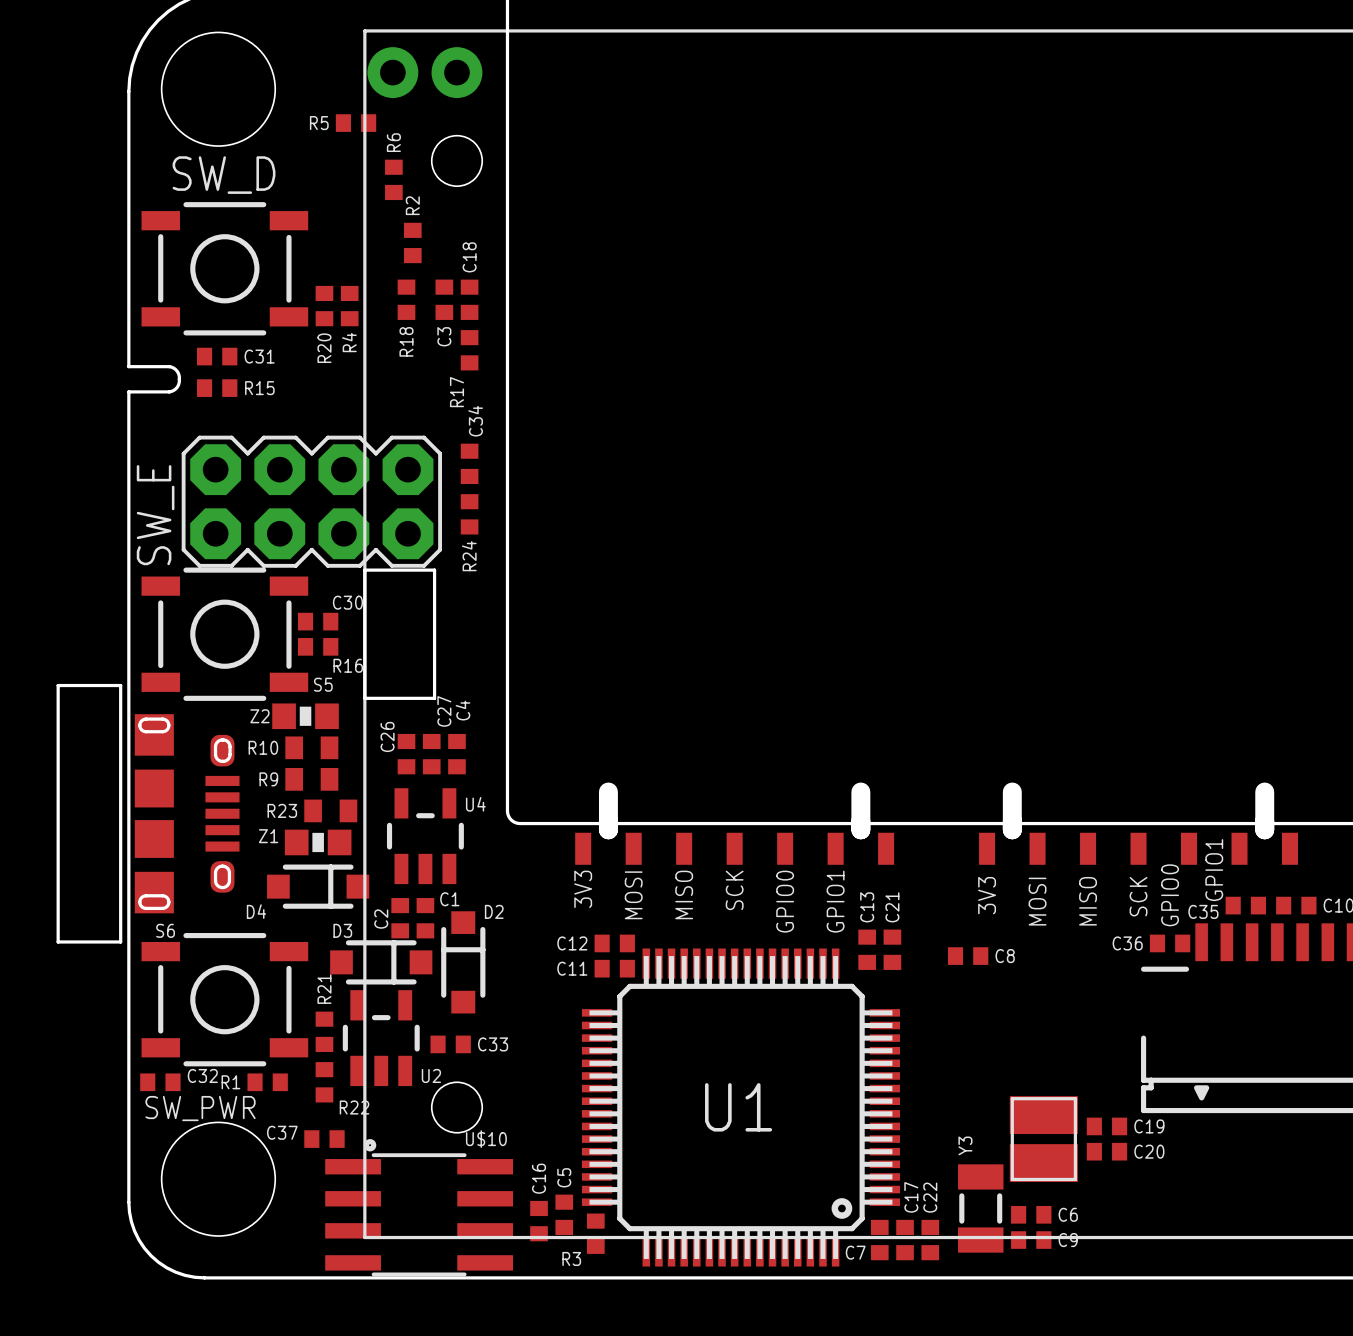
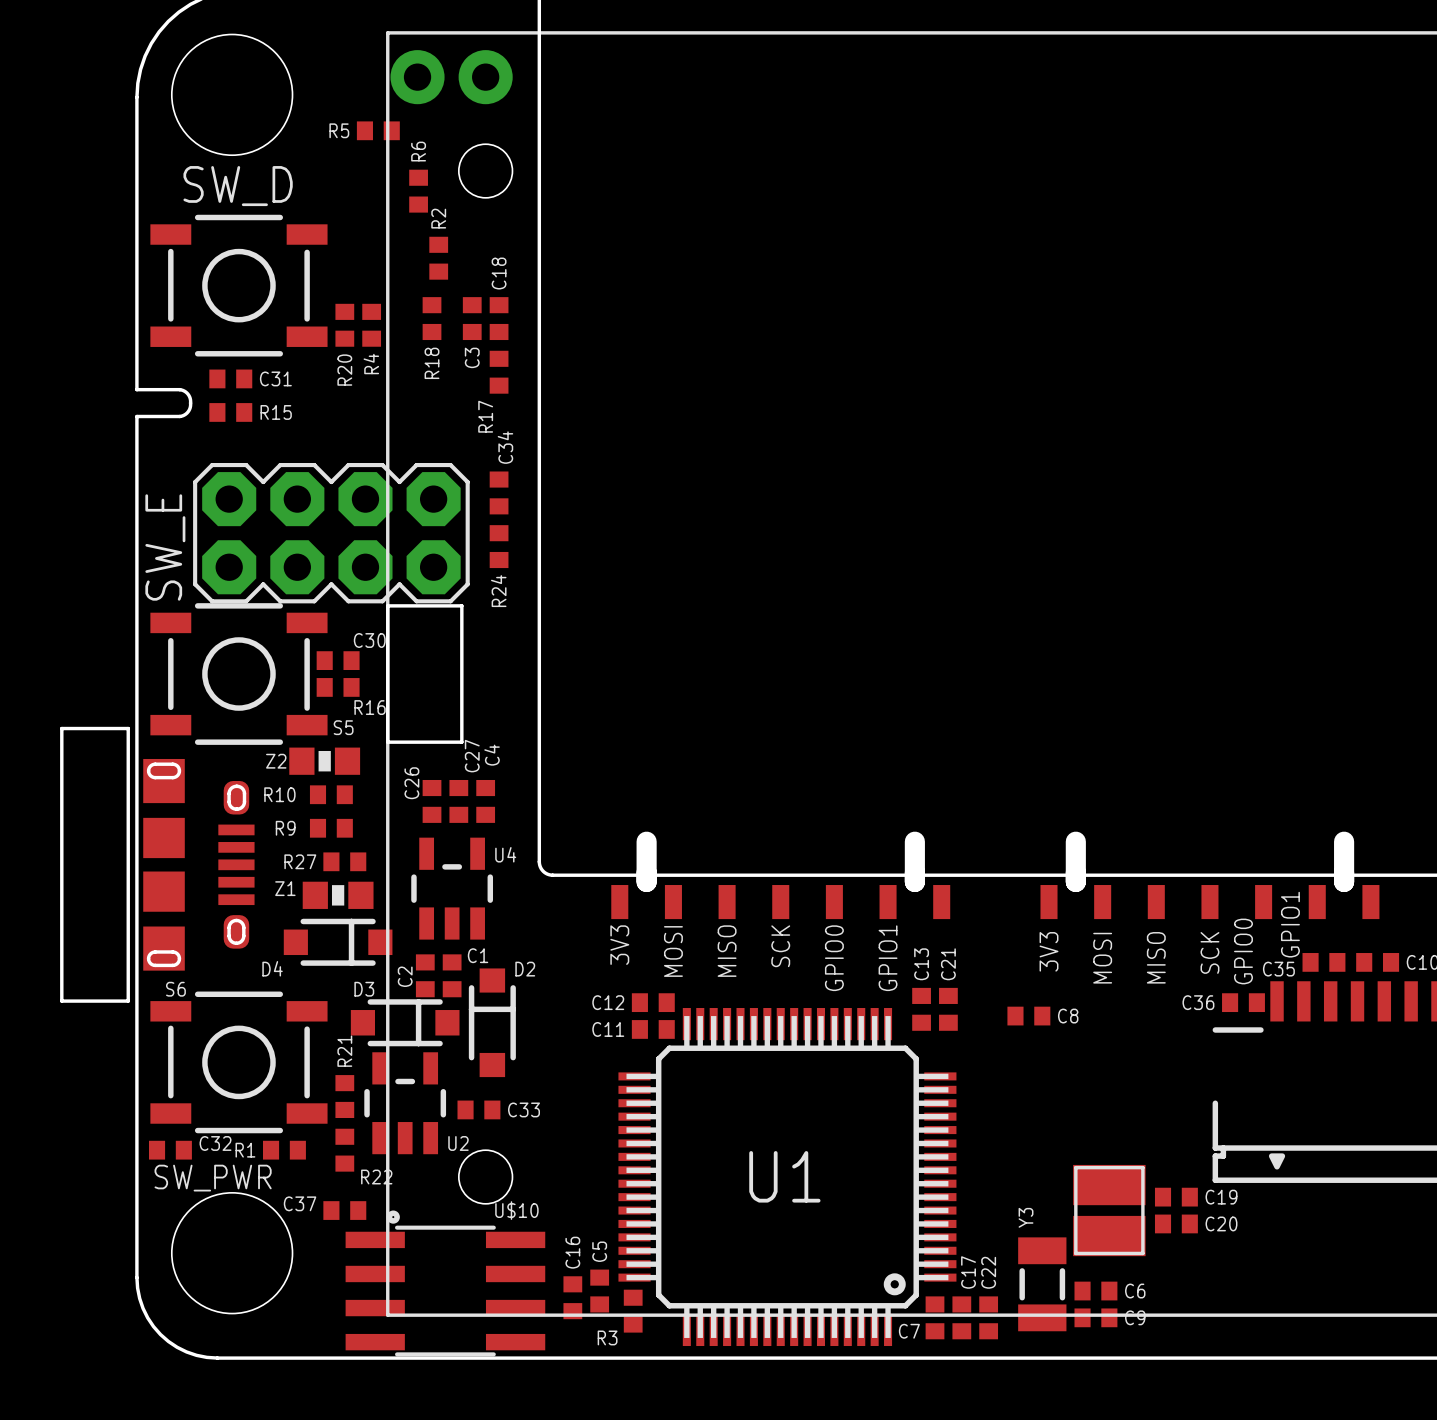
R10 footprint: [285, 736, 339, 760] -> [309, 785, 353, 805]
R9 footprint: [285, 768, 339, 791] -> [309, 818, 353, 838]
R27: none -> (344, 861)
R23: (330, 810) -> none

